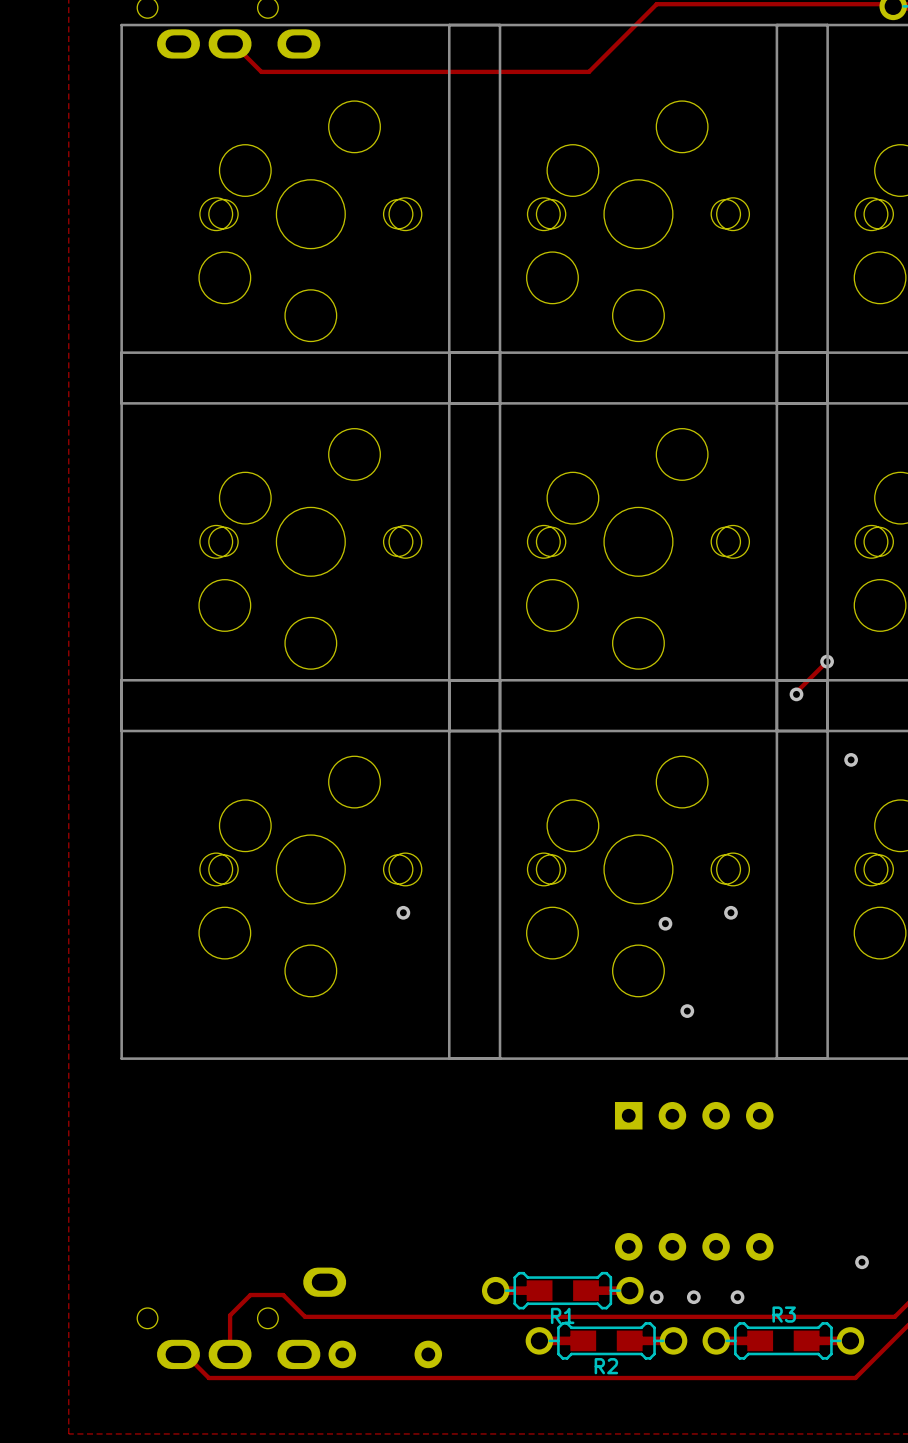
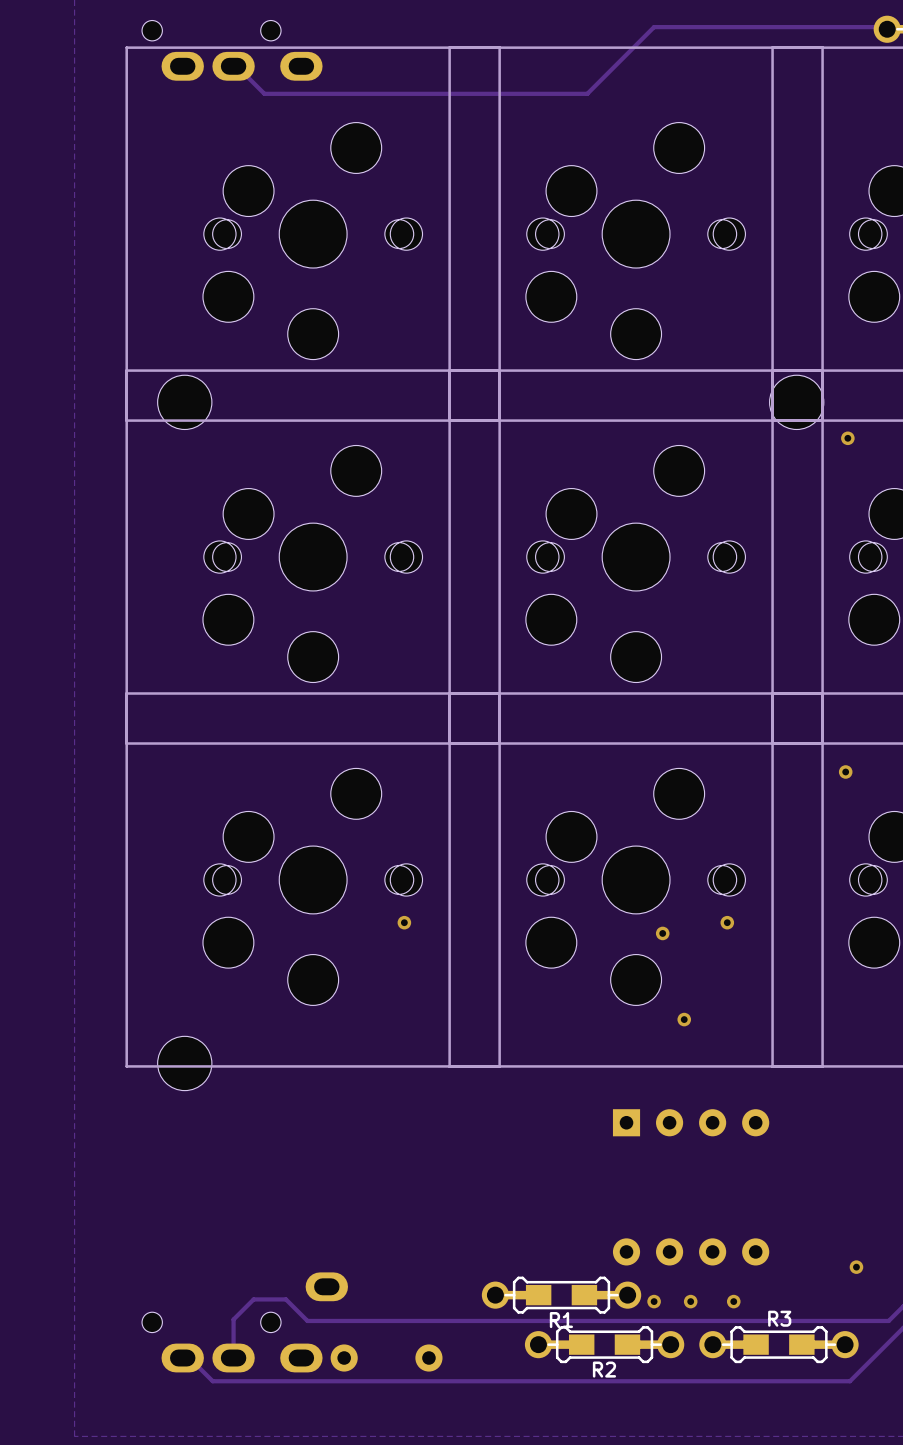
part: none -> (184, 402)
part: none -> (796, 402)
via: none -> (847, 438)
track: (827, 661) (796, 694) -> none
via: (827, 661) -> none
via: (796, 694) -> none
part: none -> (184, 1063)

